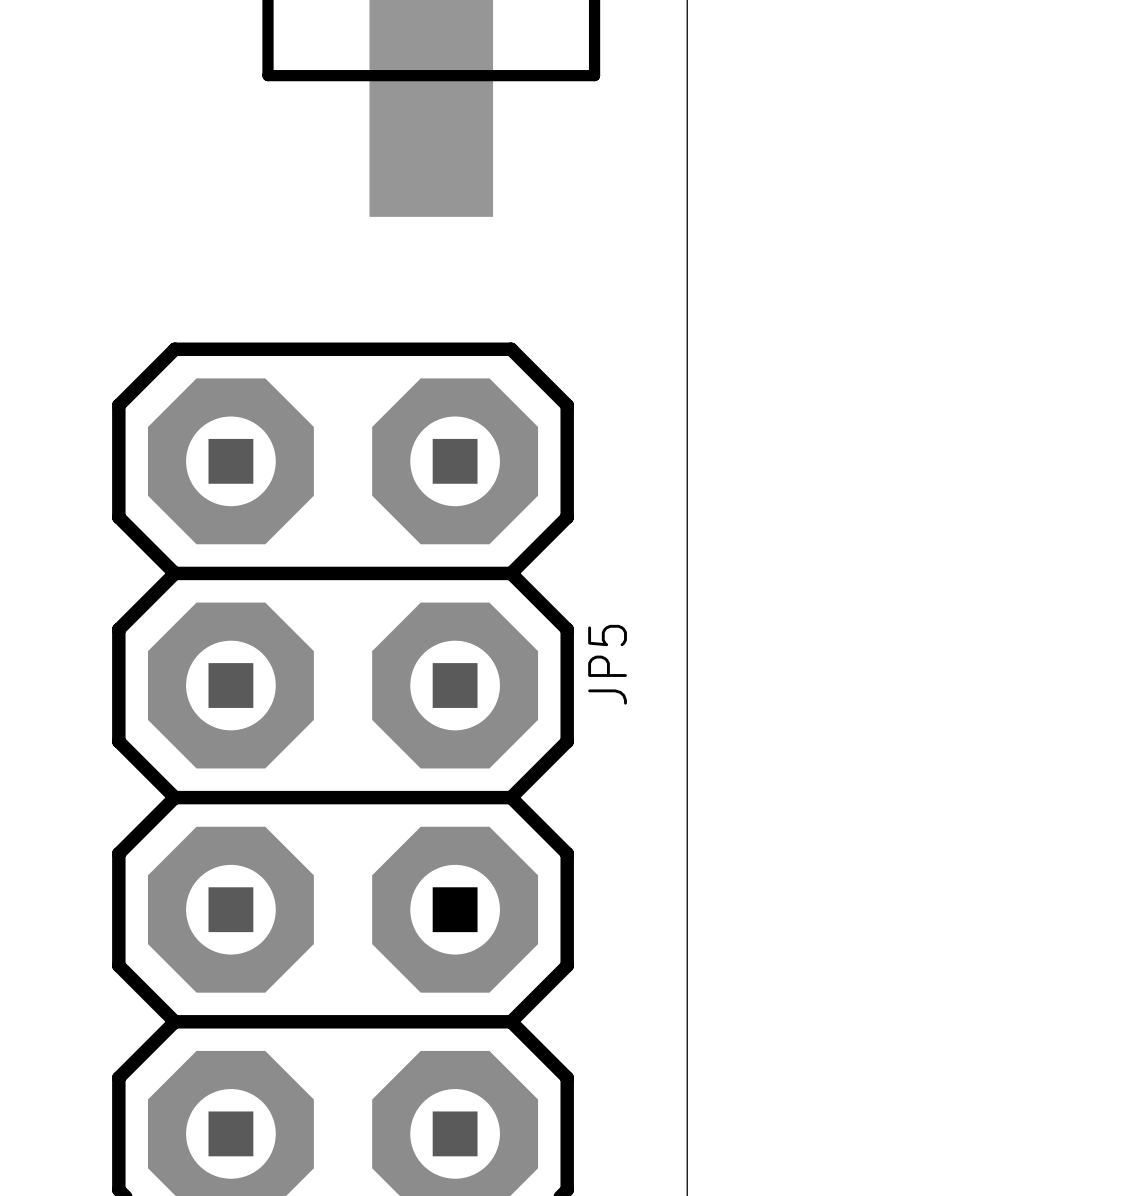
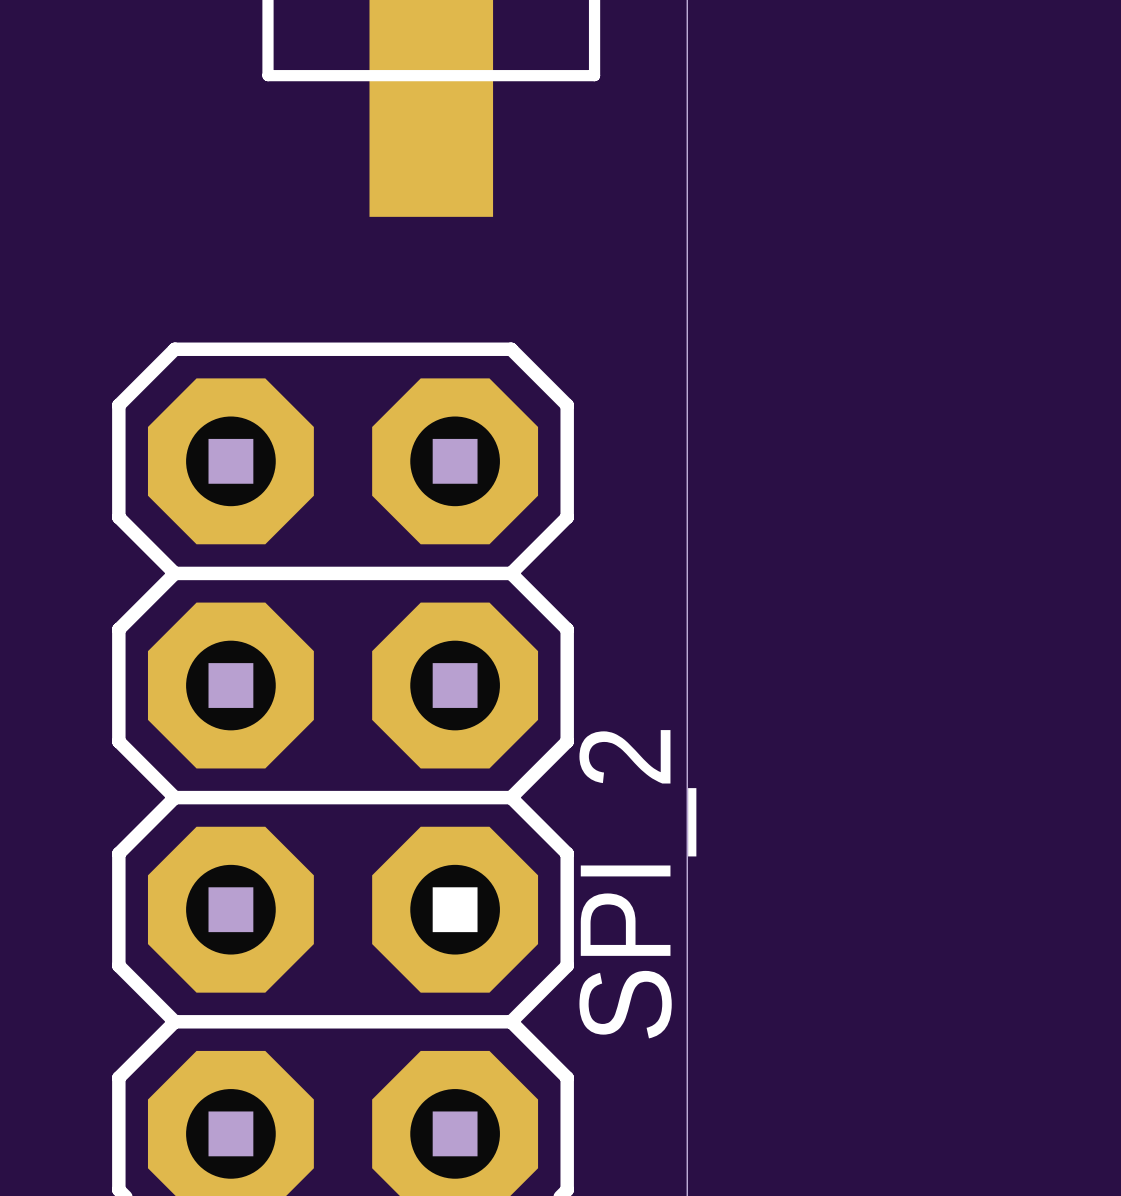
JP5 name: JP5 (607, 664) -> SPI_2 (637, 884)

